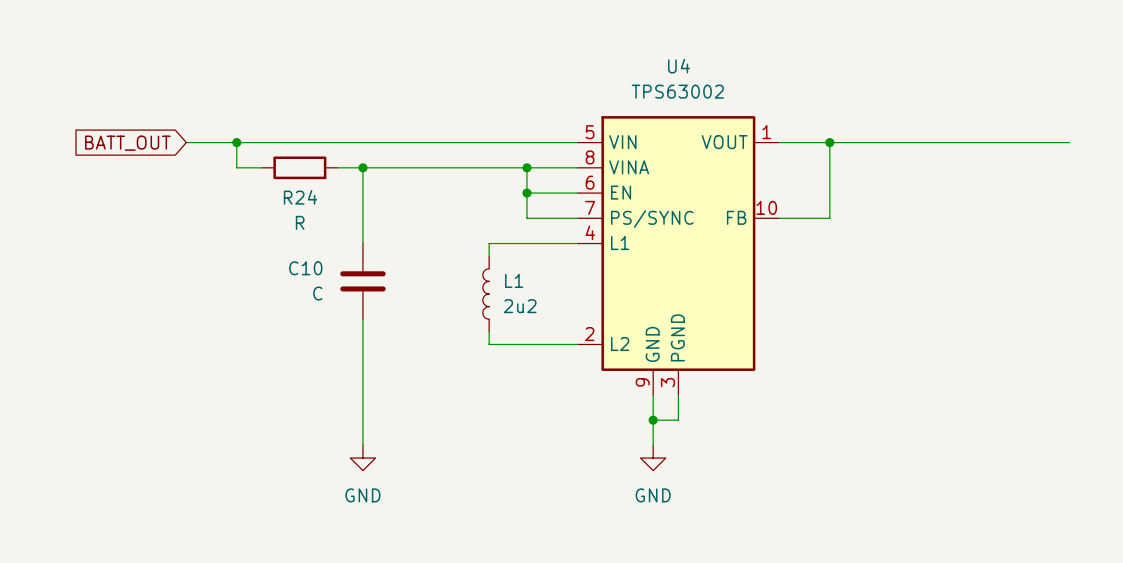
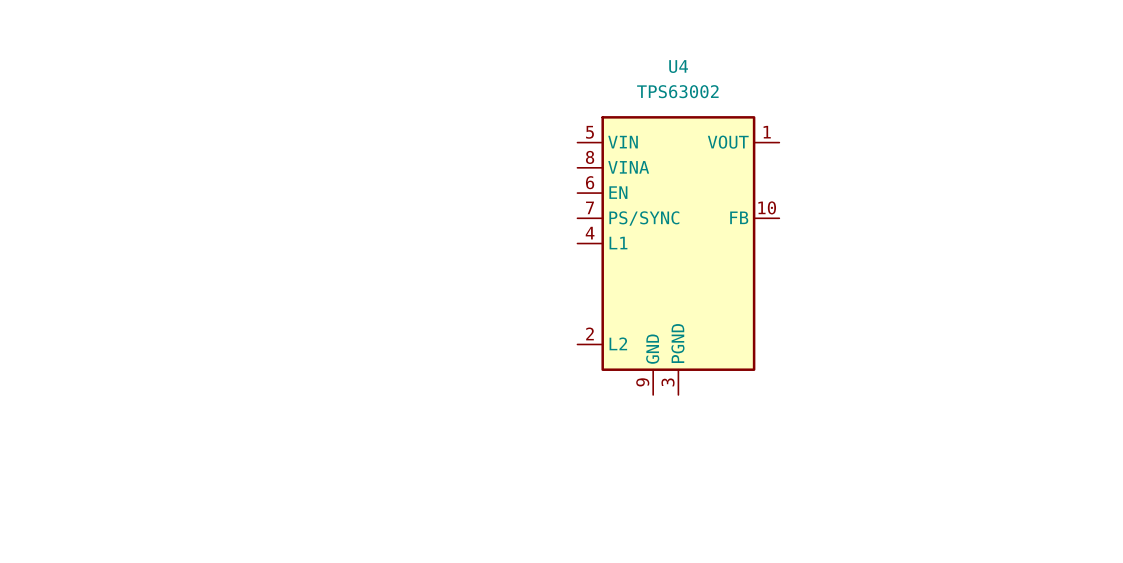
wire: (186, 142) (577, 142) -> none
wire: (236, 142) (236, 167) (262, 167) -> none
junction: (236, 142) -> none
wire: (779, 142) (1069, 142) -> none
wire: (829, 142) (829, 218) (779, 218) -> none
junction: (829, 142) -> none
global label: BATT_OUT (127, 143) -> none
R24: R (299, 167) -> none
wire: (337, 167) (577, 167) -> none
wire: (362, 167) (362, 243) -> none
junction: (362, 167) -> none
wire: (526, 167) (526, 218) (577, 218) -> none
junction: (526, 167) -> none
wire: (526, 193) (577, 193) -> none
junction: (526, 193) -> none
wire: (577, 243) (489, 243) (489, 256) -> none
C10: C (362, 281) -> none
L1: 2u2 (485, 294) -> none
wire: (362, 319) (362, 445) -> none
wire: (489, 331) (489, 344) (577, 344) -> none
wire: (653, 394) (653, 445) -> none
wire: (678, 394) (678, 420) (653, 420) -> none
junction: (653, 420) -> none
power symbol: GND (362, 458) -> none
power symbol: GND (653, 458) -> none

